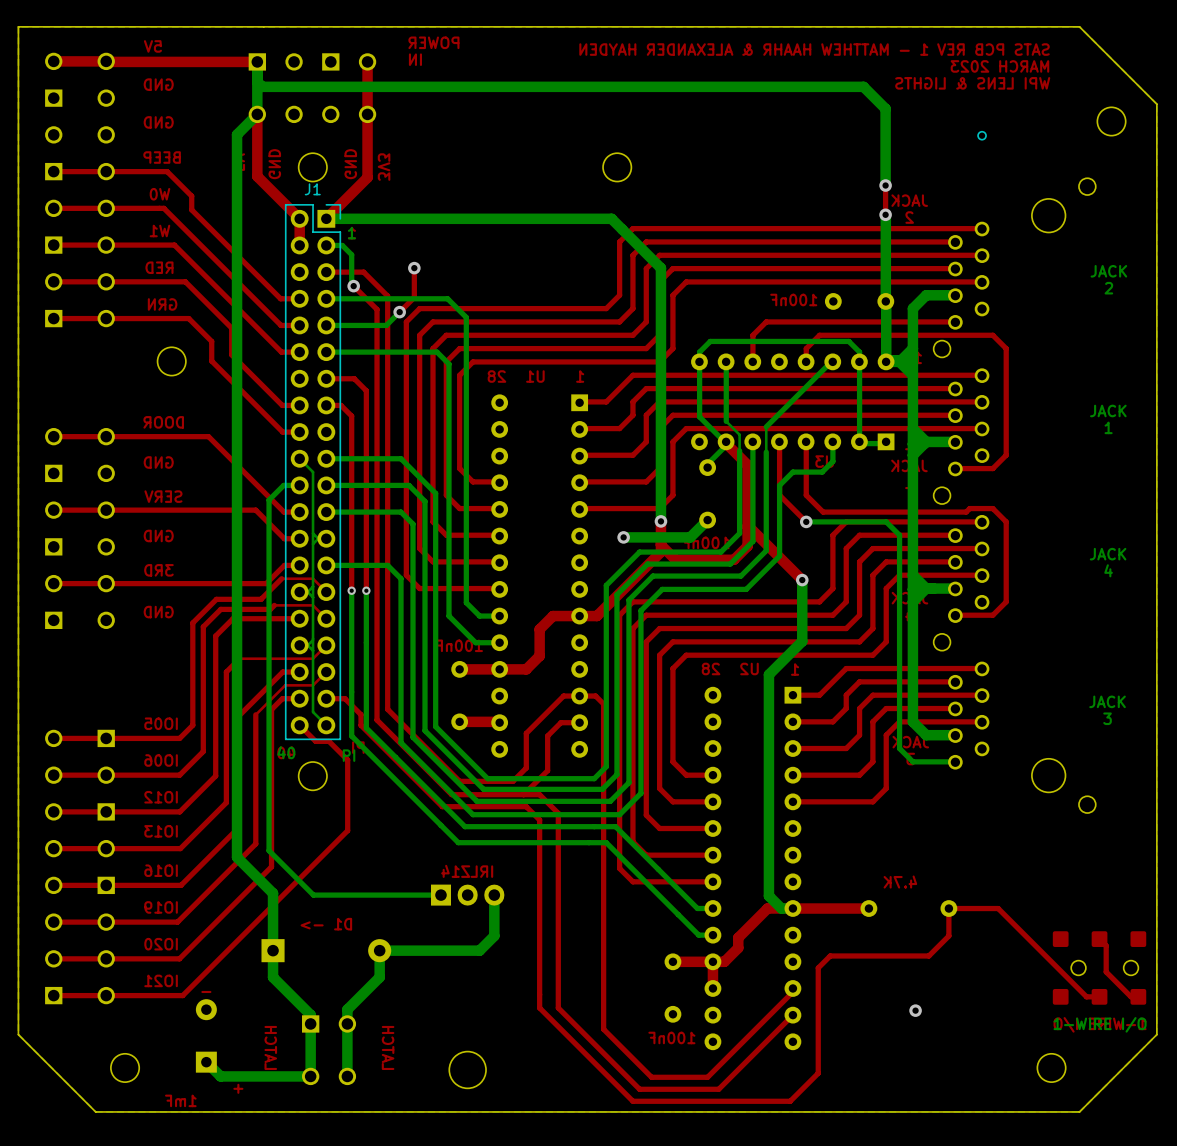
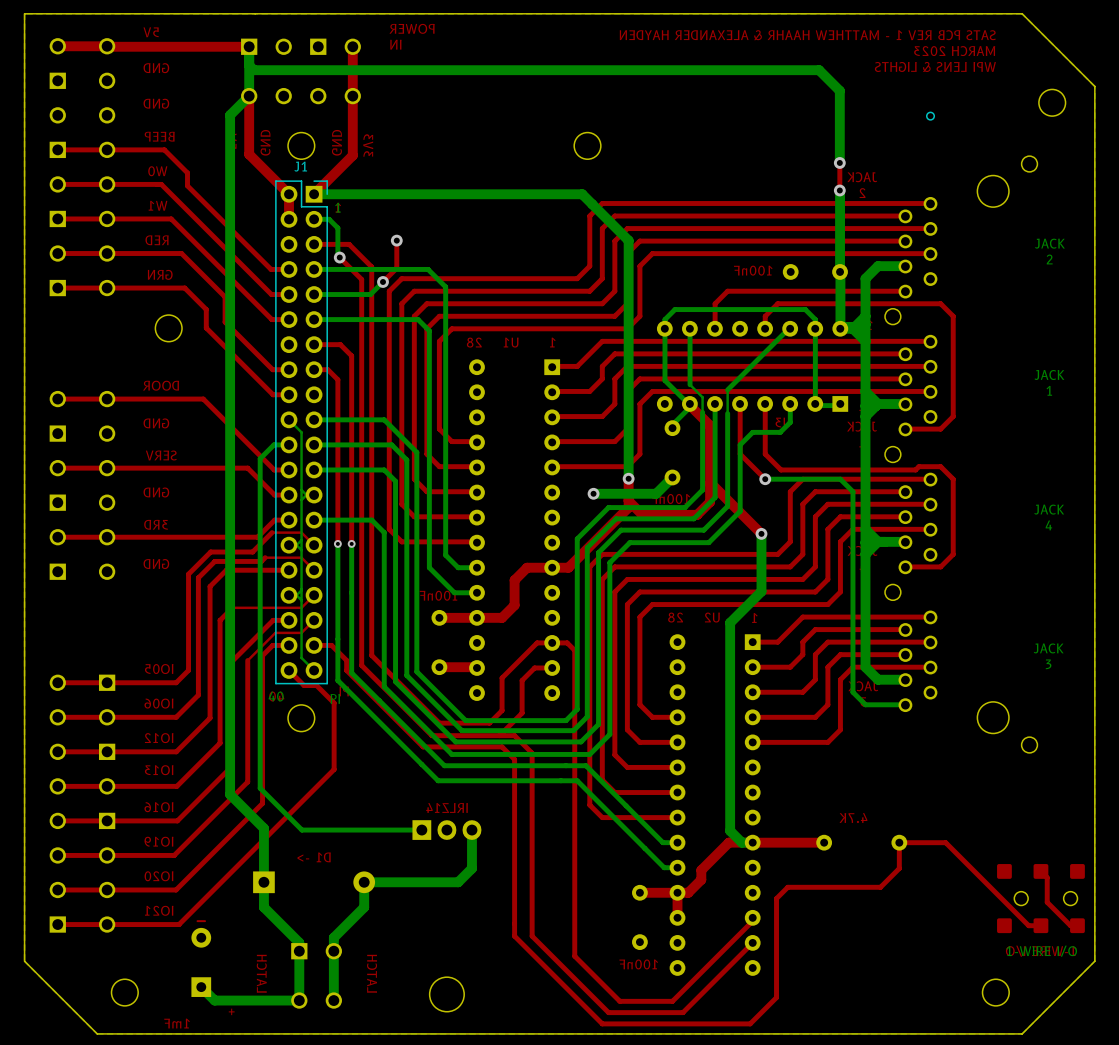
via: (915, 1010) -> none

